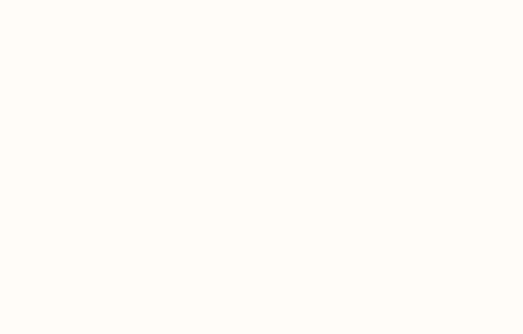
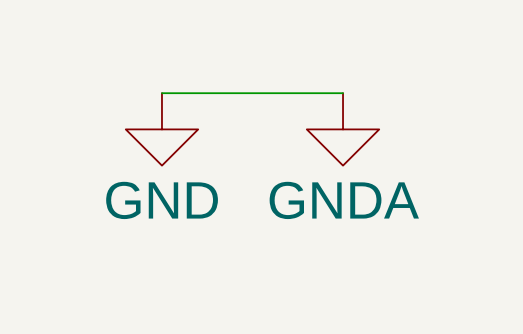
wire: none -> (161, 93) (343, 93)
power symbol: none -> GND (161, 129)
power symbol: none -> GNDA (343, 129)

